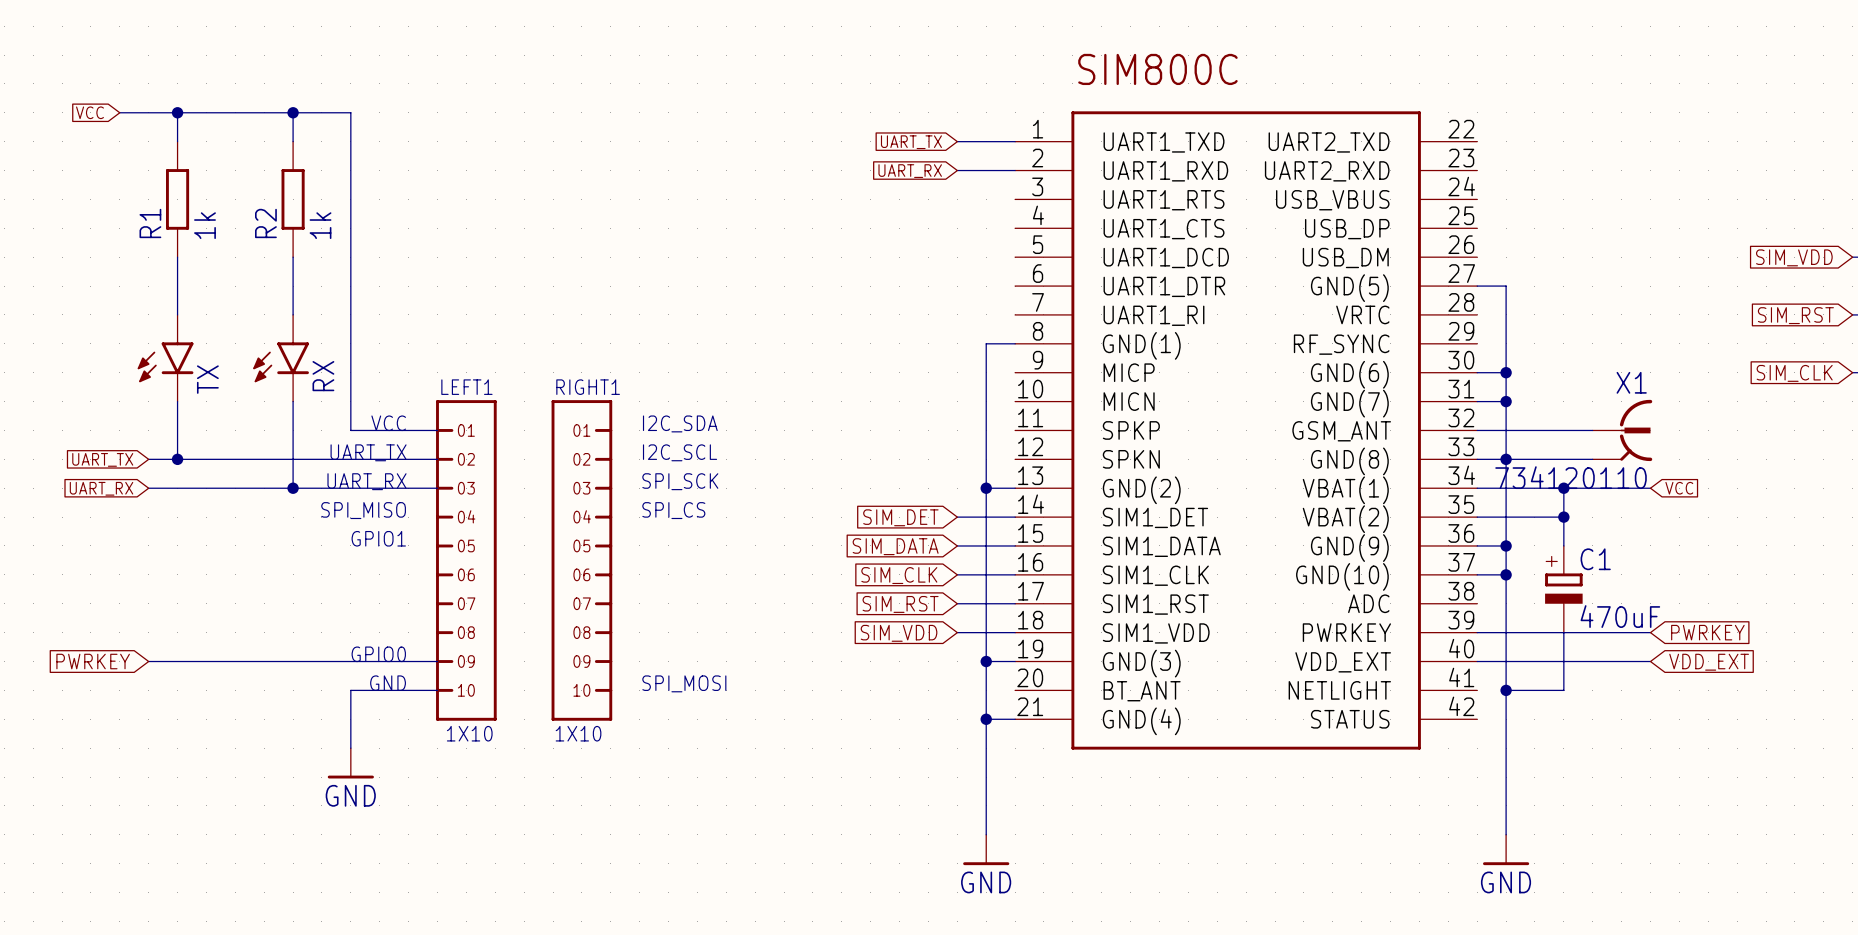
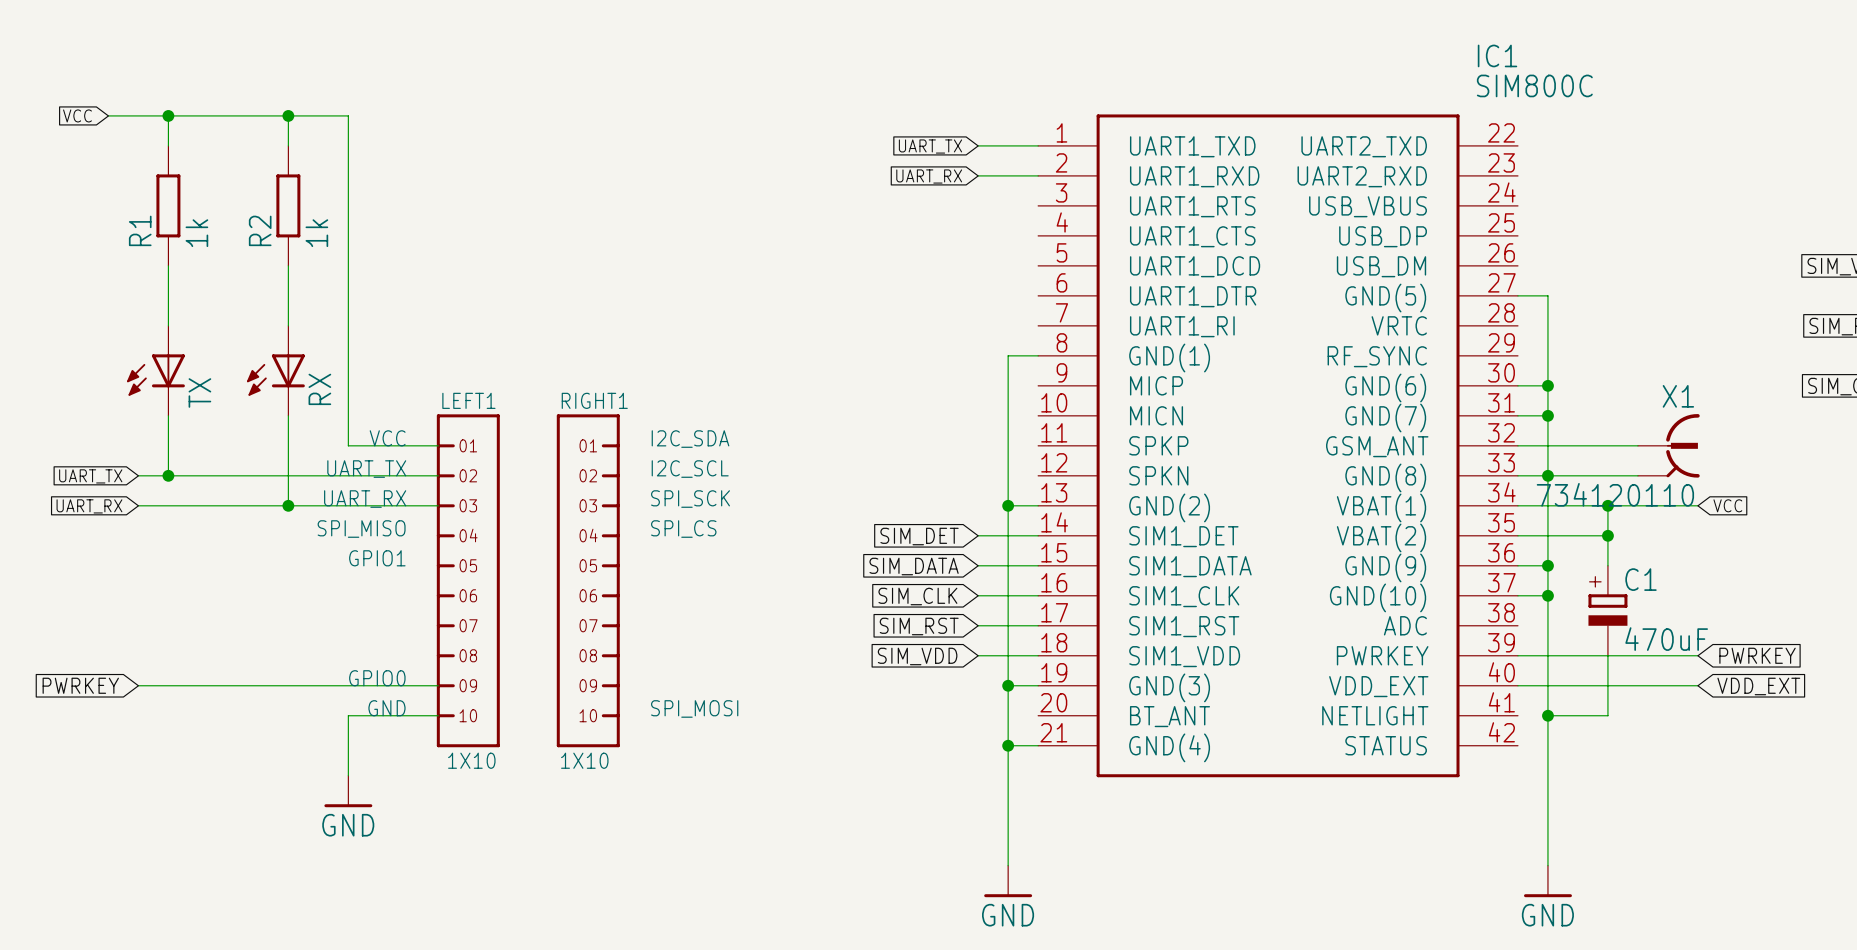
IC1 name: none -> IC1 (1497, 55)
IC1 text: SIM800C (1157, 69) -> none
IC1 value: none -> SIM800C (1534, 85)
TX symbol: [137, 314, 194, 402] -> [127, 325, 185, 416]
RX symbol: [253, 314, 309, 402] -> [246, 325, 305, 416]

